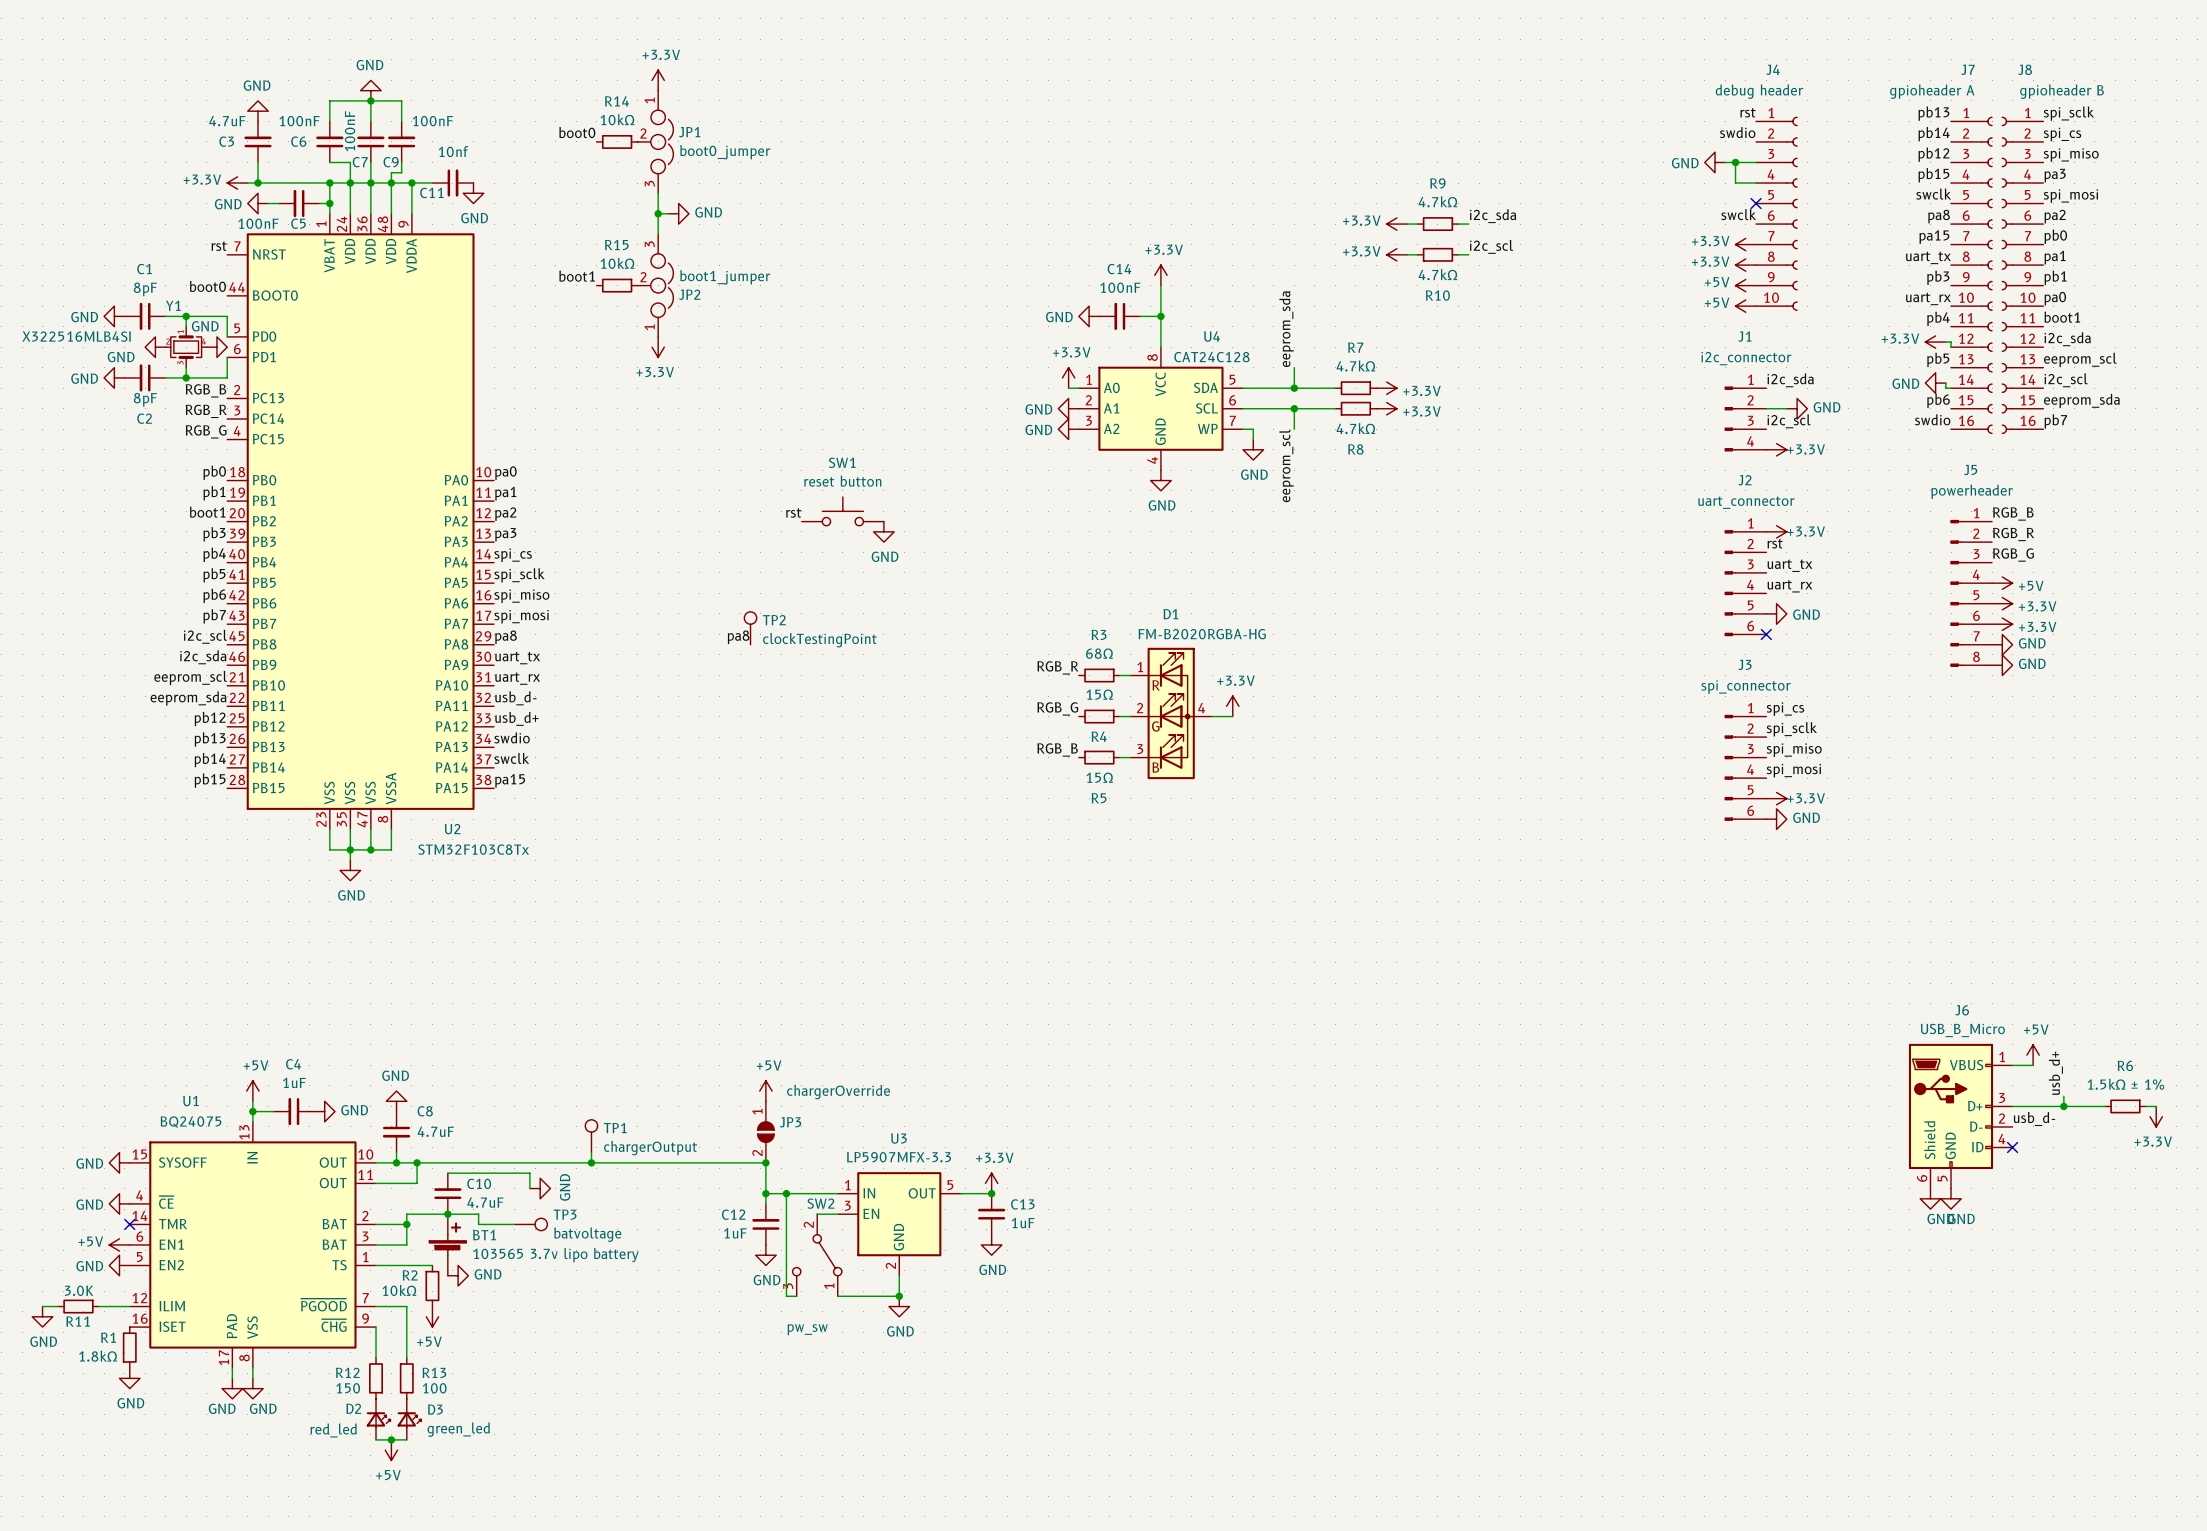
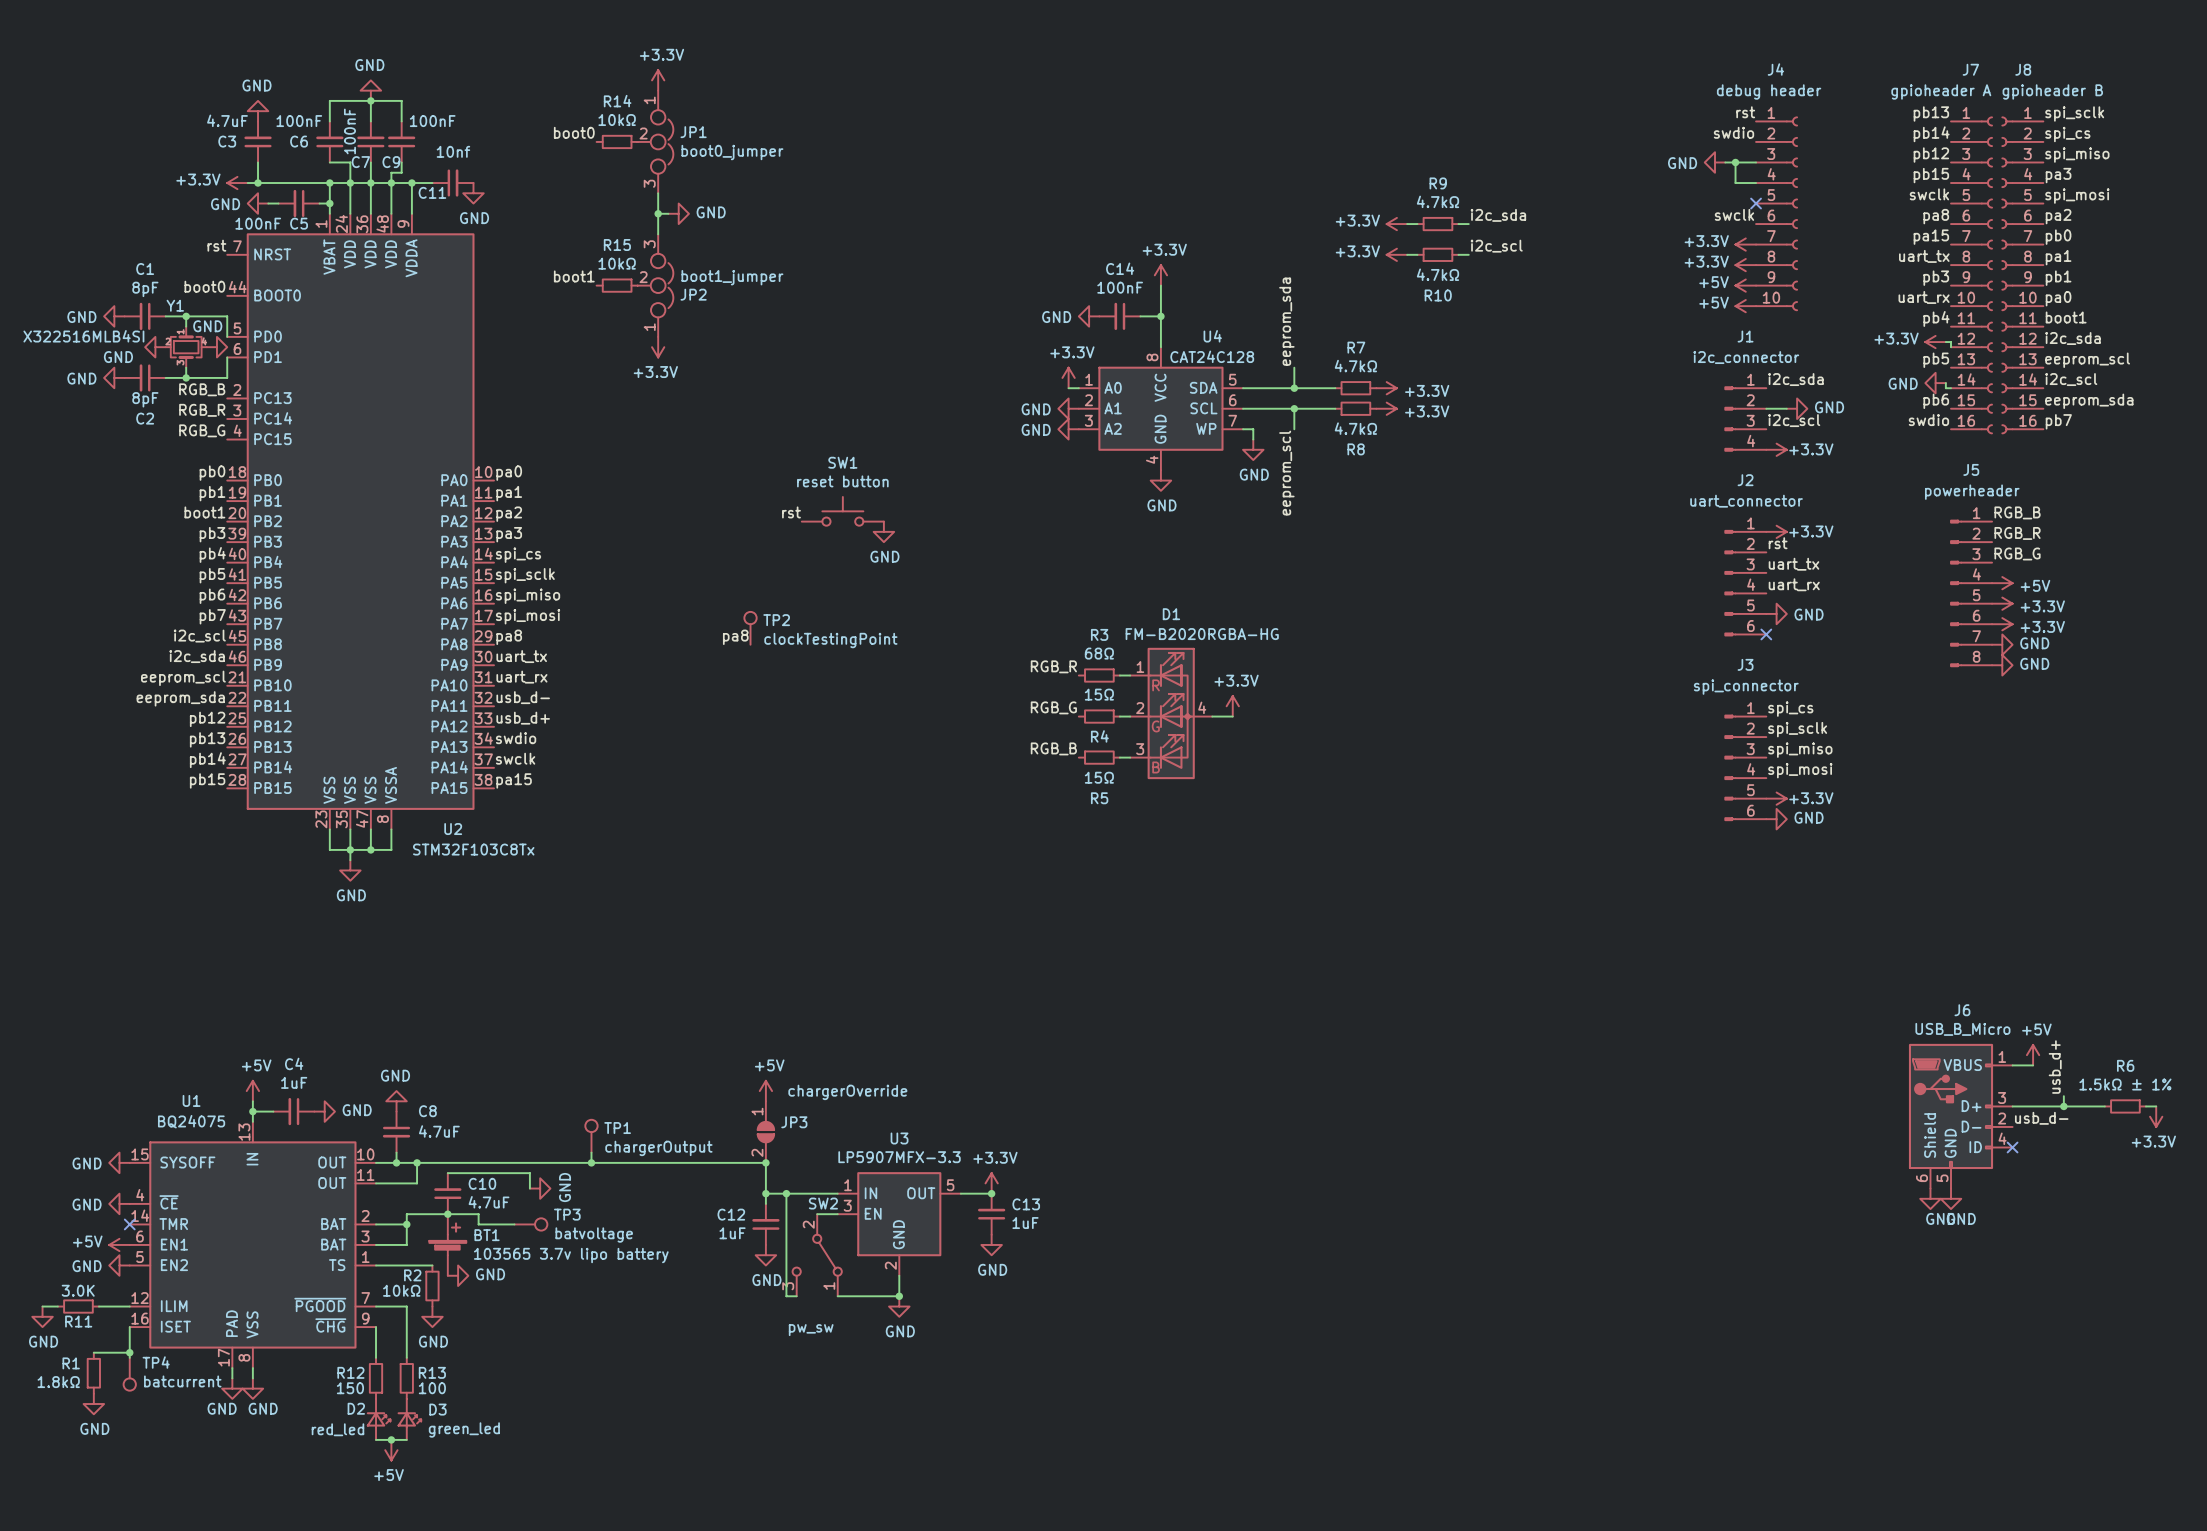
power symbol: +5V (432, 1316) -> GND (432, 1316)
wire: none -> (129, 1327) (129, 1357)
R1 position: (129, 1347) -> (93, 1373)
wire: none -> (93, 1352) (129, 1352)
junction: none -> (129, 1352)
TP4: none -> batcurrent (129, 1374)
power symbol position: GND (129, 1378) -> GND (93, 1404)

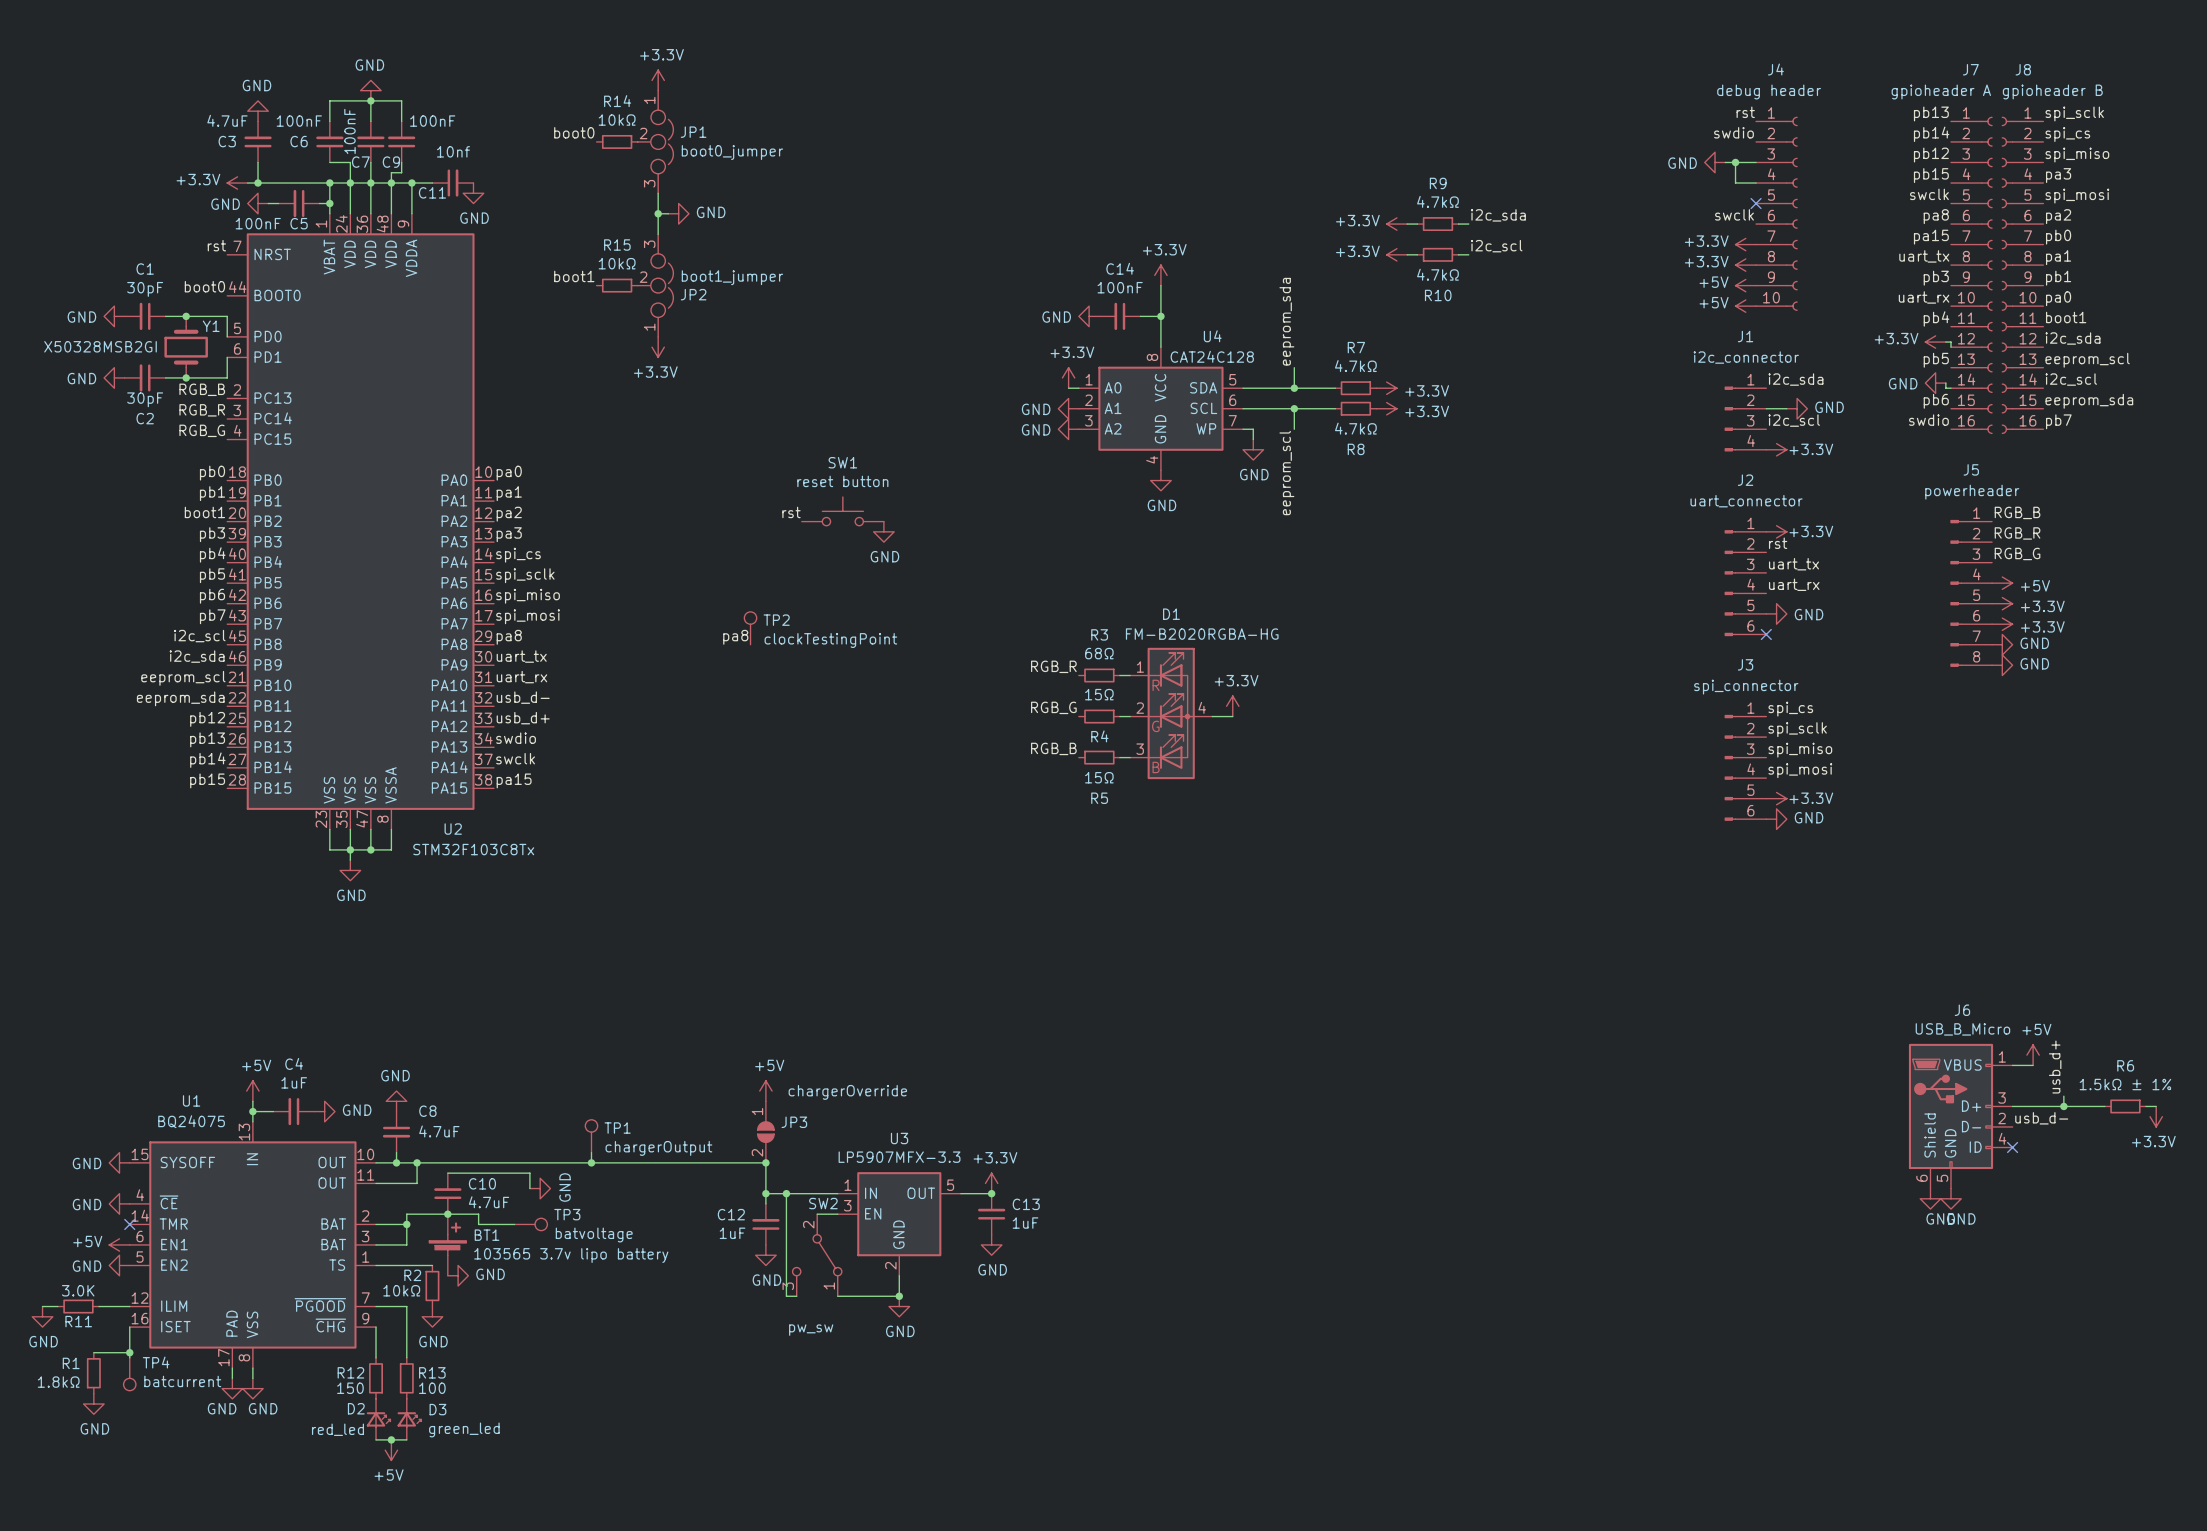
C1 value: 8pF (145, 289) -> 30pF (145, 289)
Y1 name position: Y1 (175, 305) -> Y1 (211, 326)
Y1 symbol: [165, 326, 207, 368] -> [164, 316, 208, 378]
Y1 value: X322516MLB4SI (83, 336) -> X50328MSB2GI (100, 346)
power symbol: GND (155, 347) -> none
power symbol: GND (216, 347) -> none
C2 value: 8pF (145, 399) -> 30pF (145, 399)

